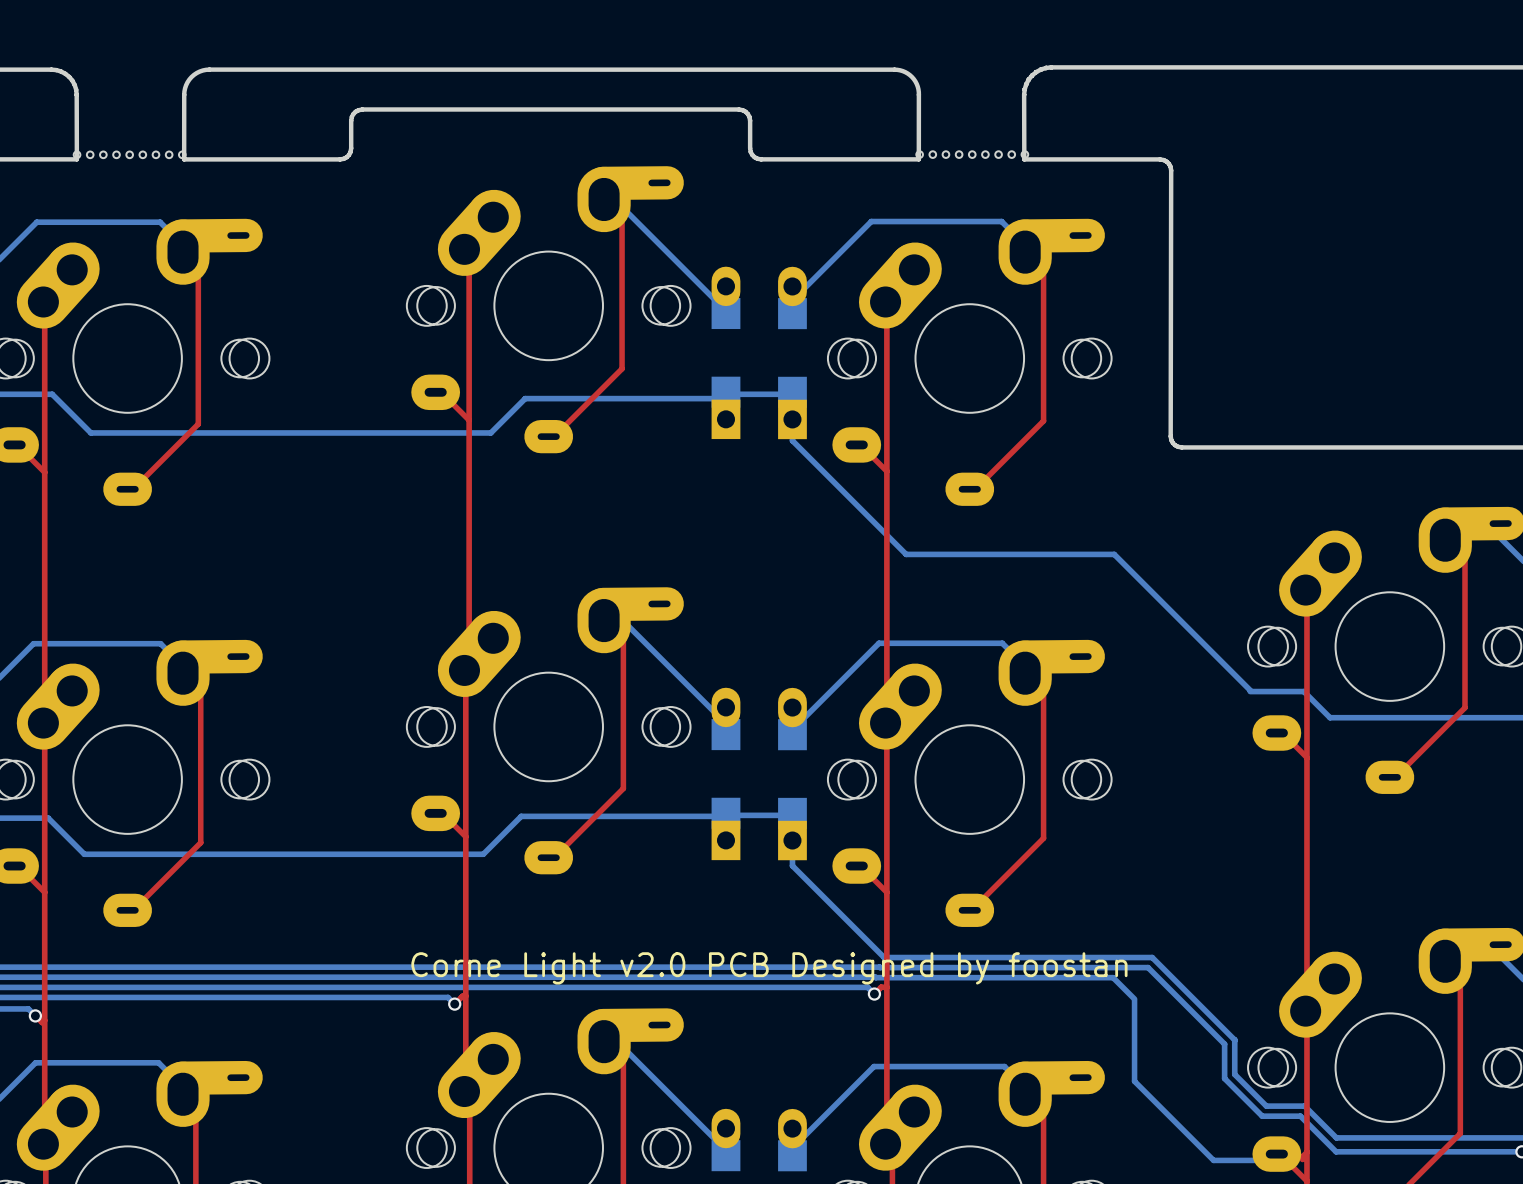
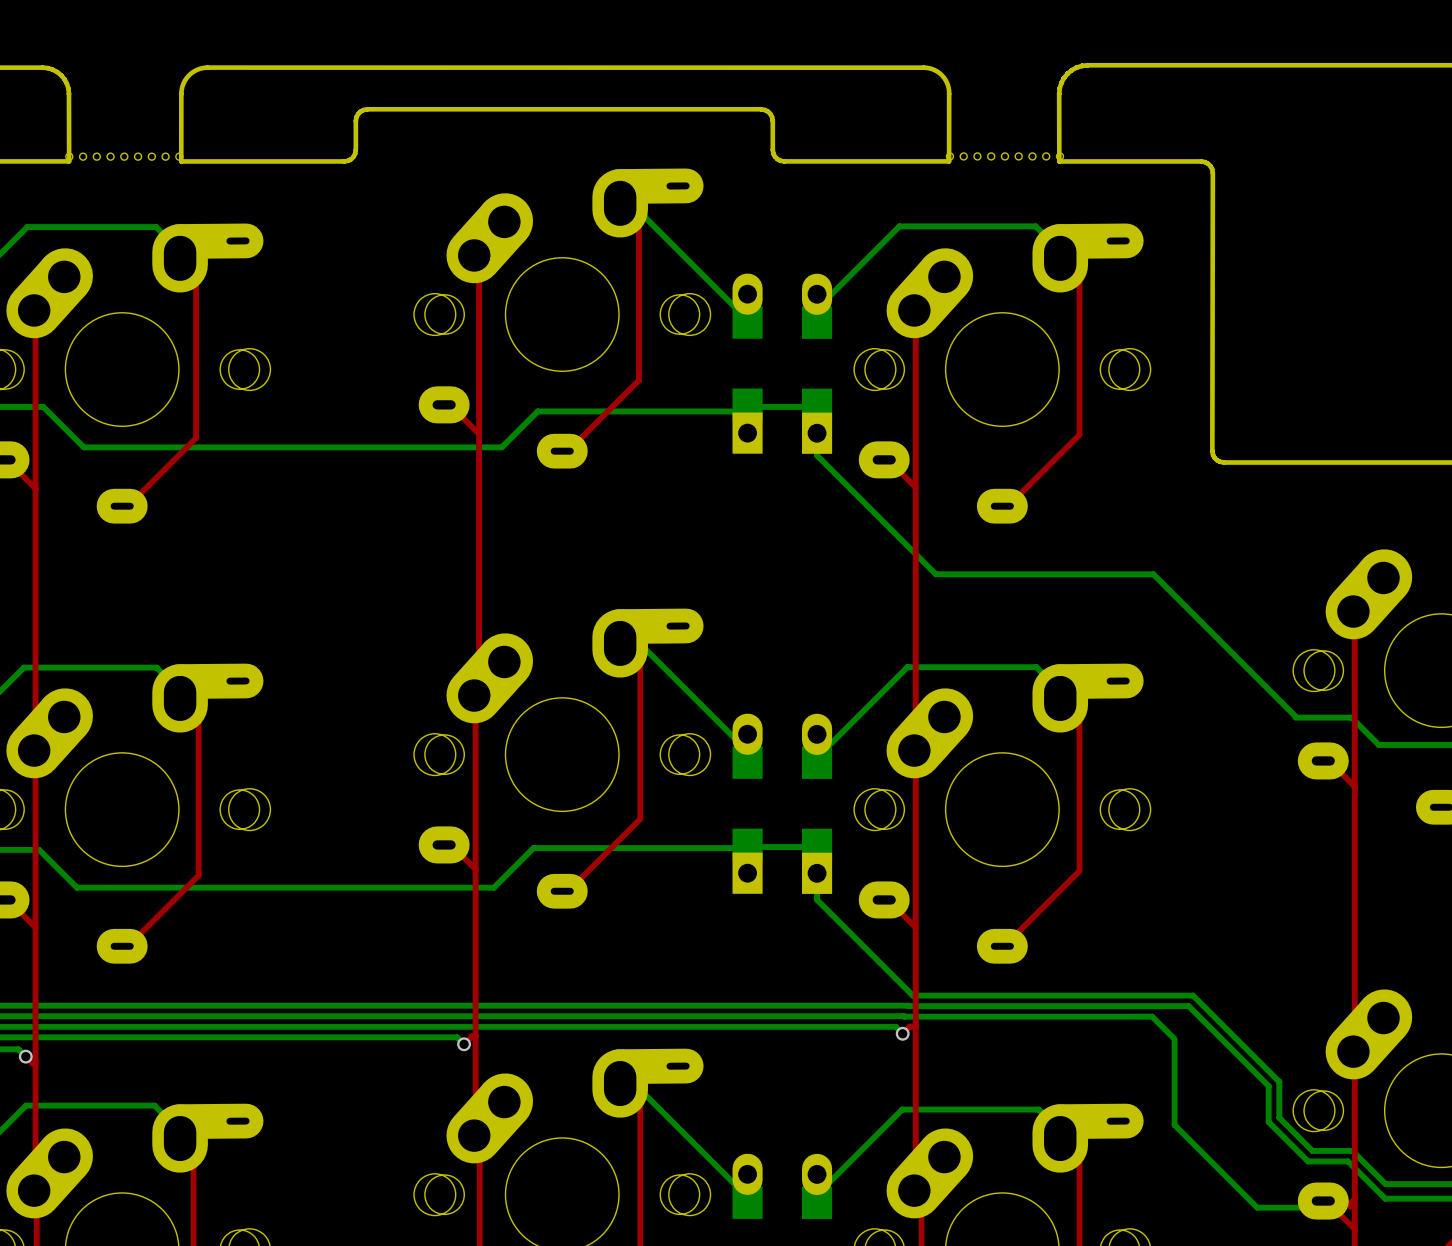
text: Corne Light v2.0 PCB Designed by foostan (769, 968) -> none

